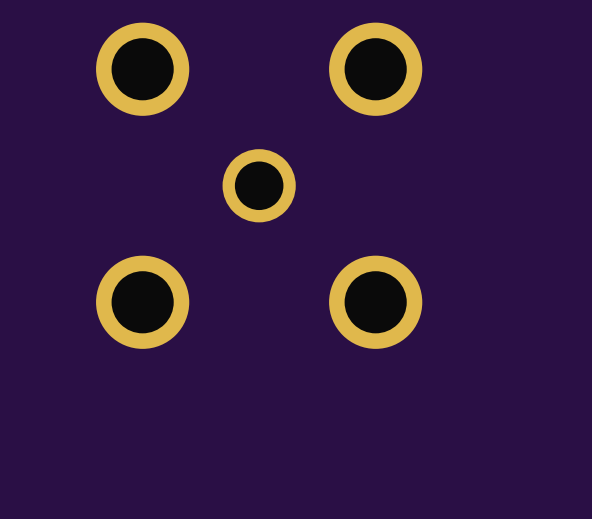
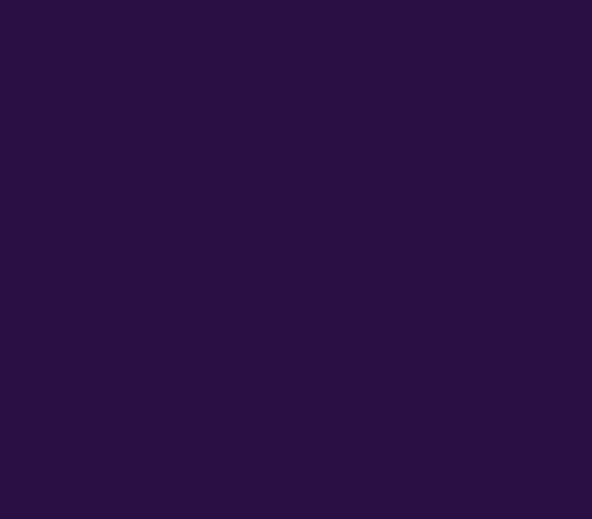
part: (259, 185) -> none

